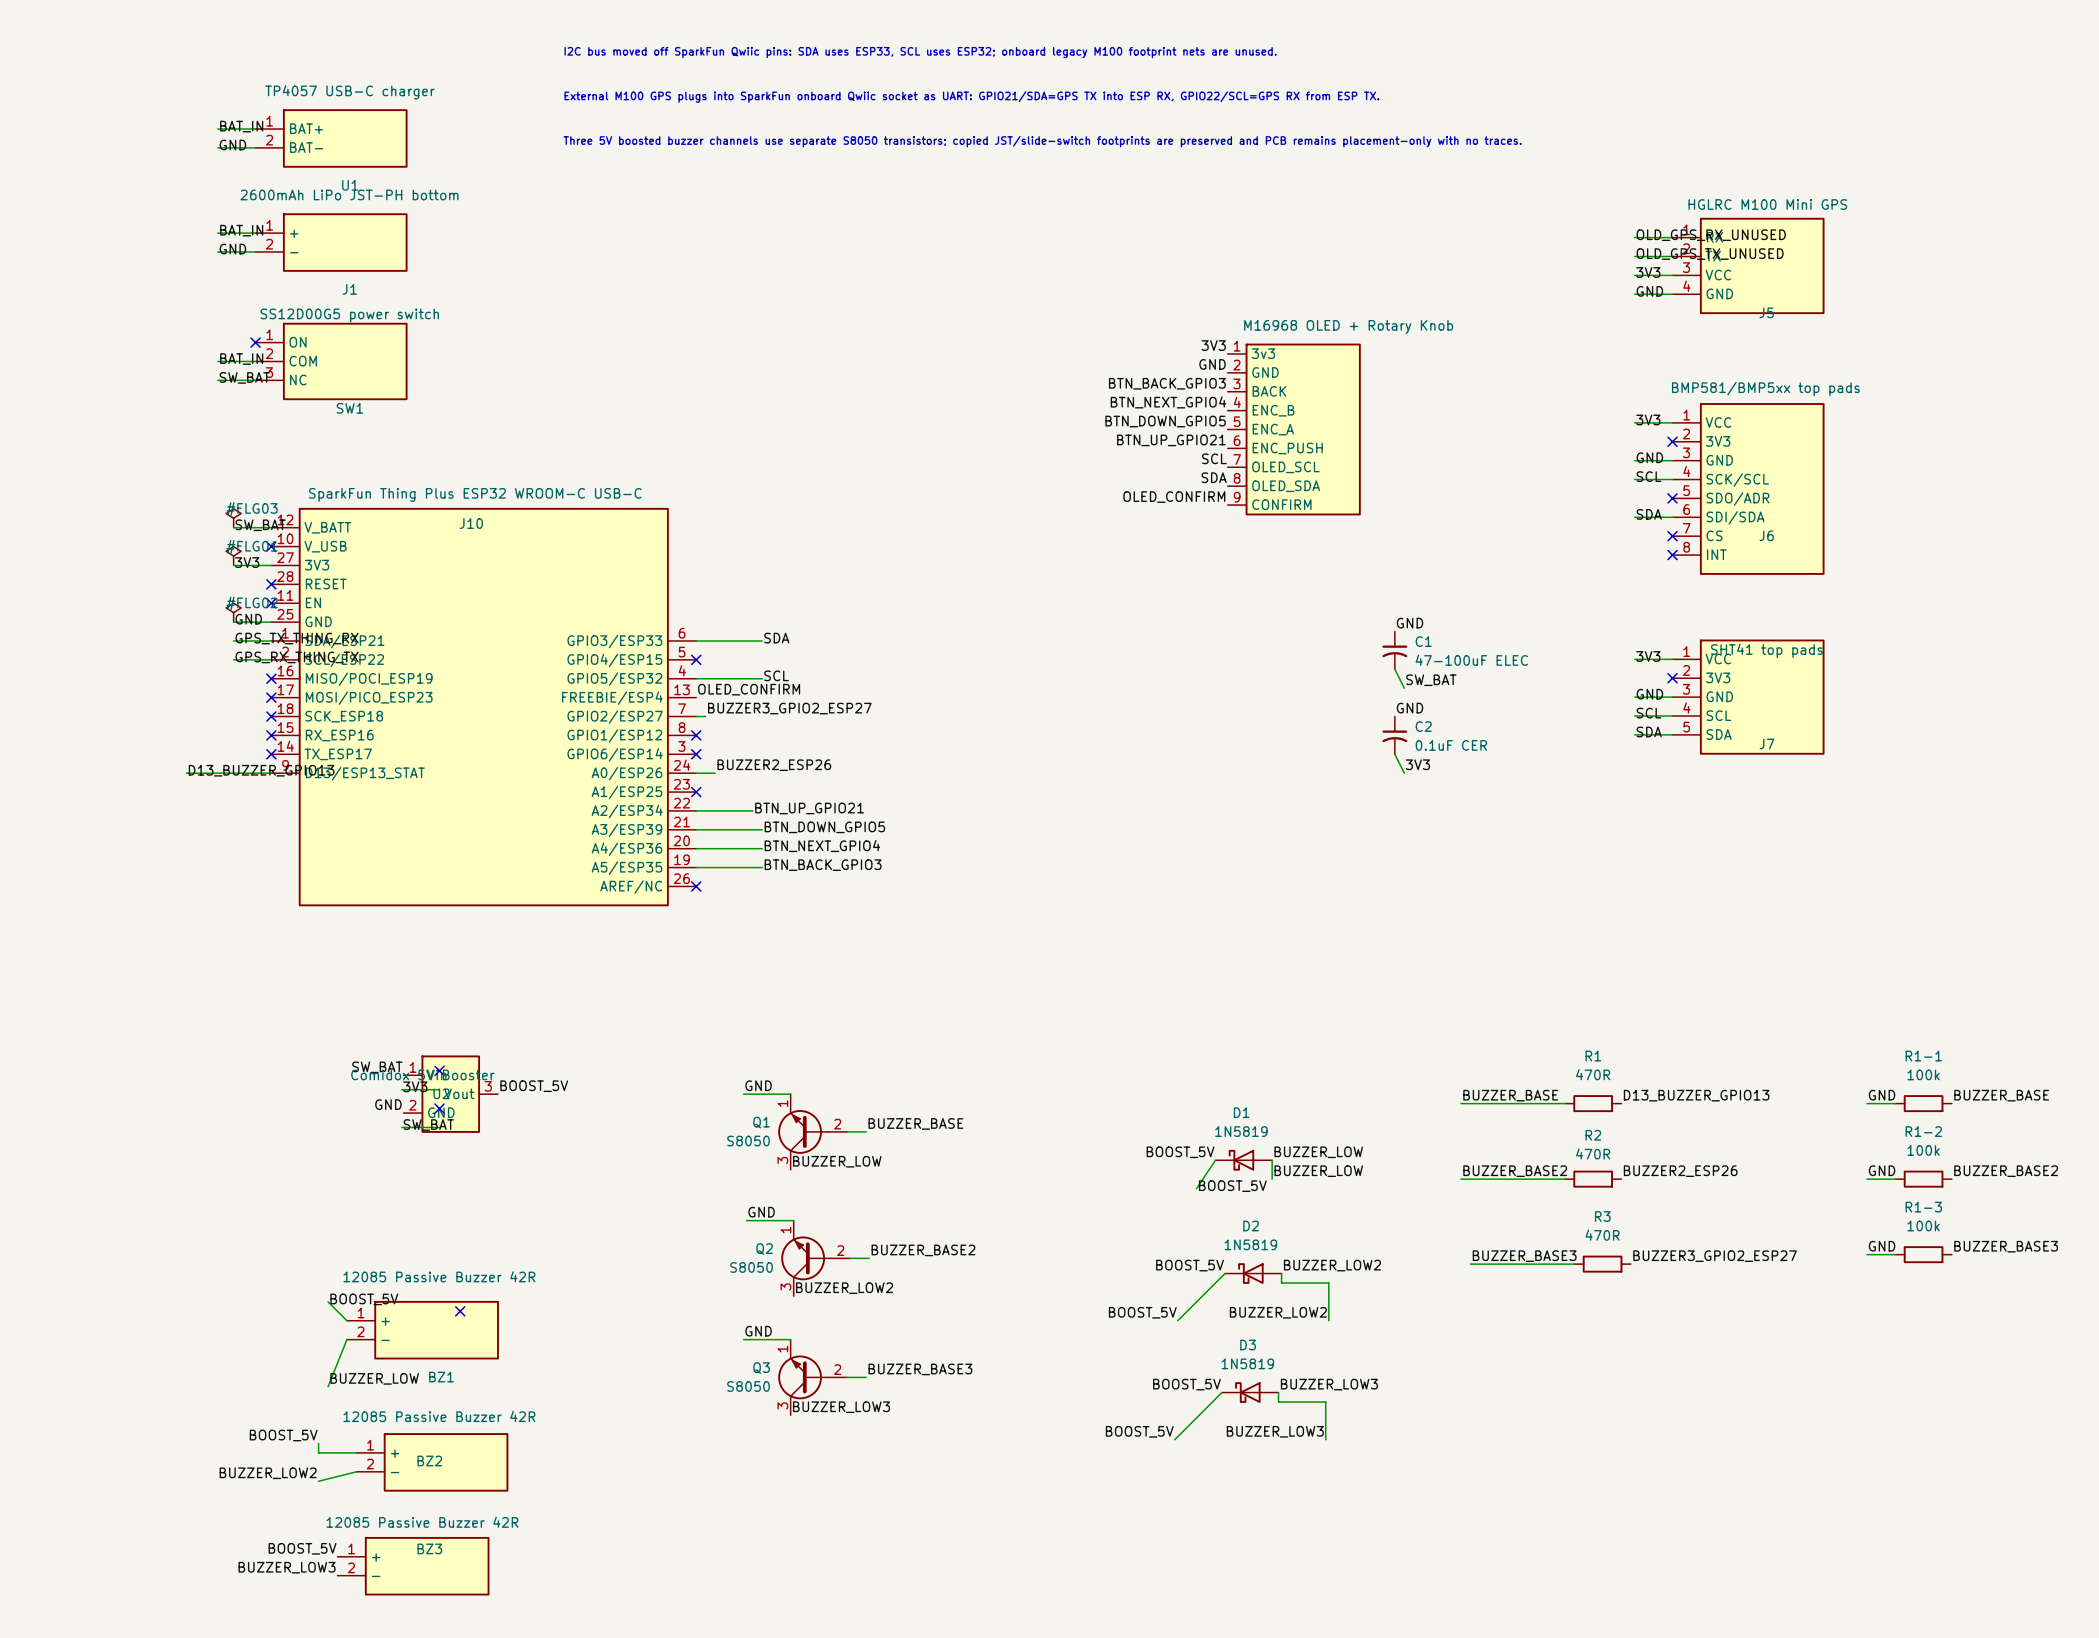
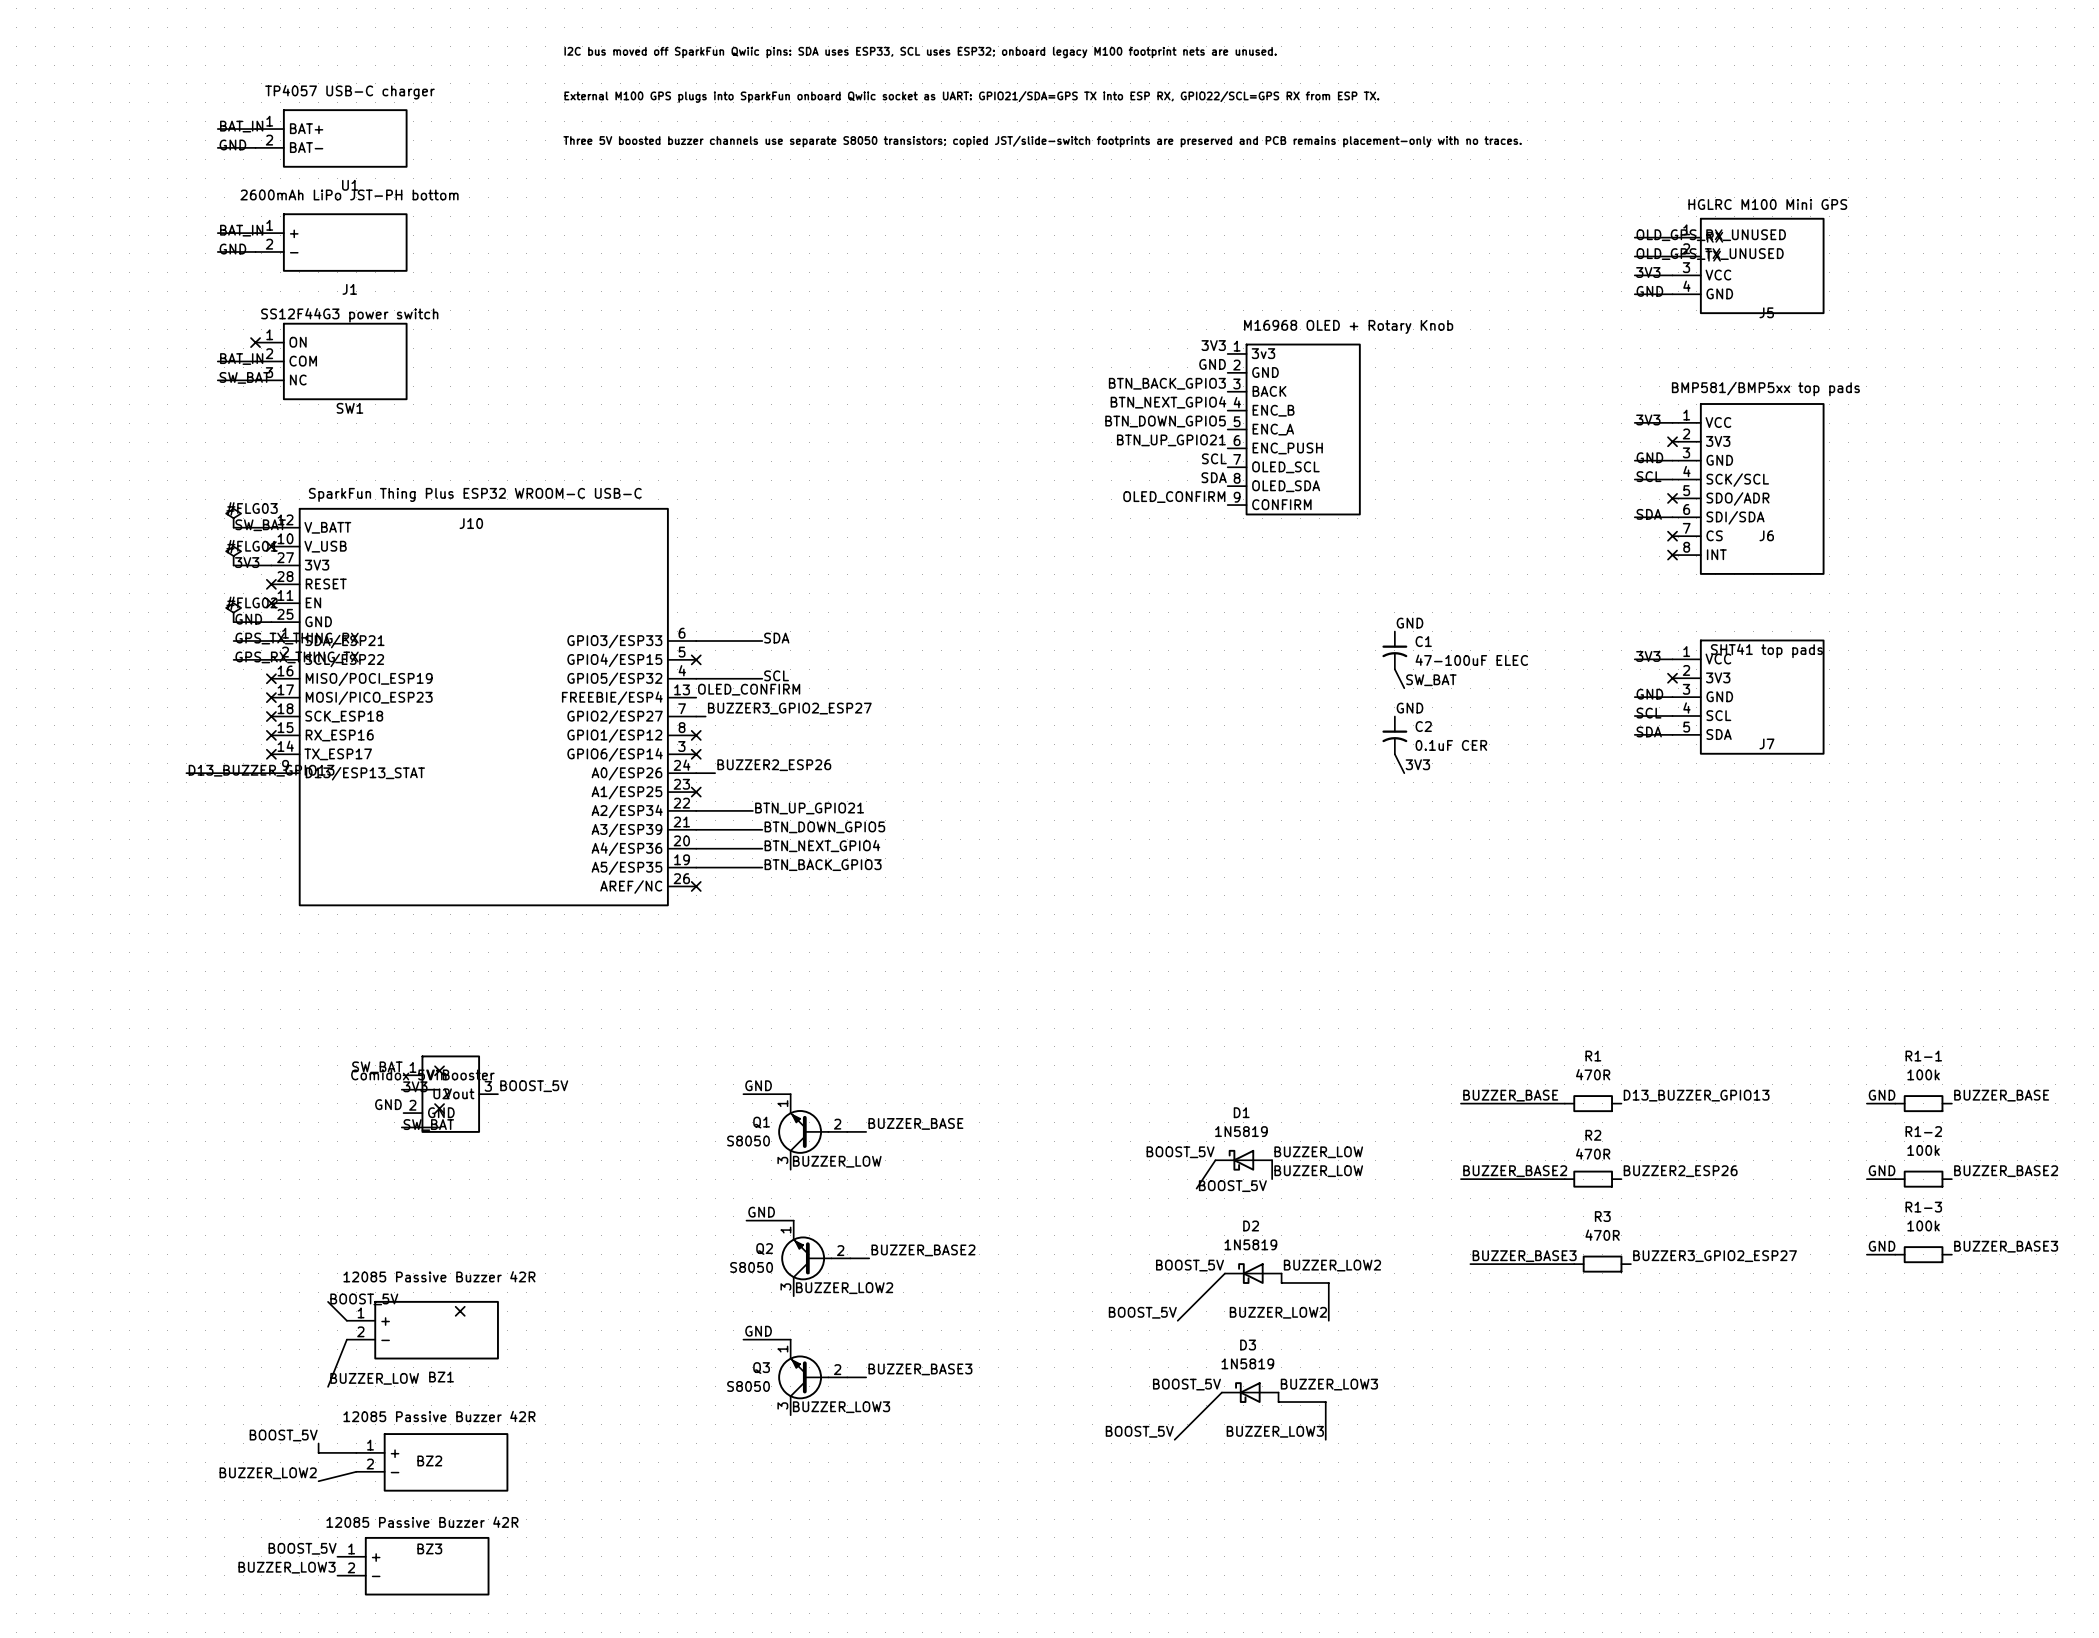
SW1 value: SS12D00G5 power switch (349, 315) -> SS12F44G3 power switch (349, 315)

